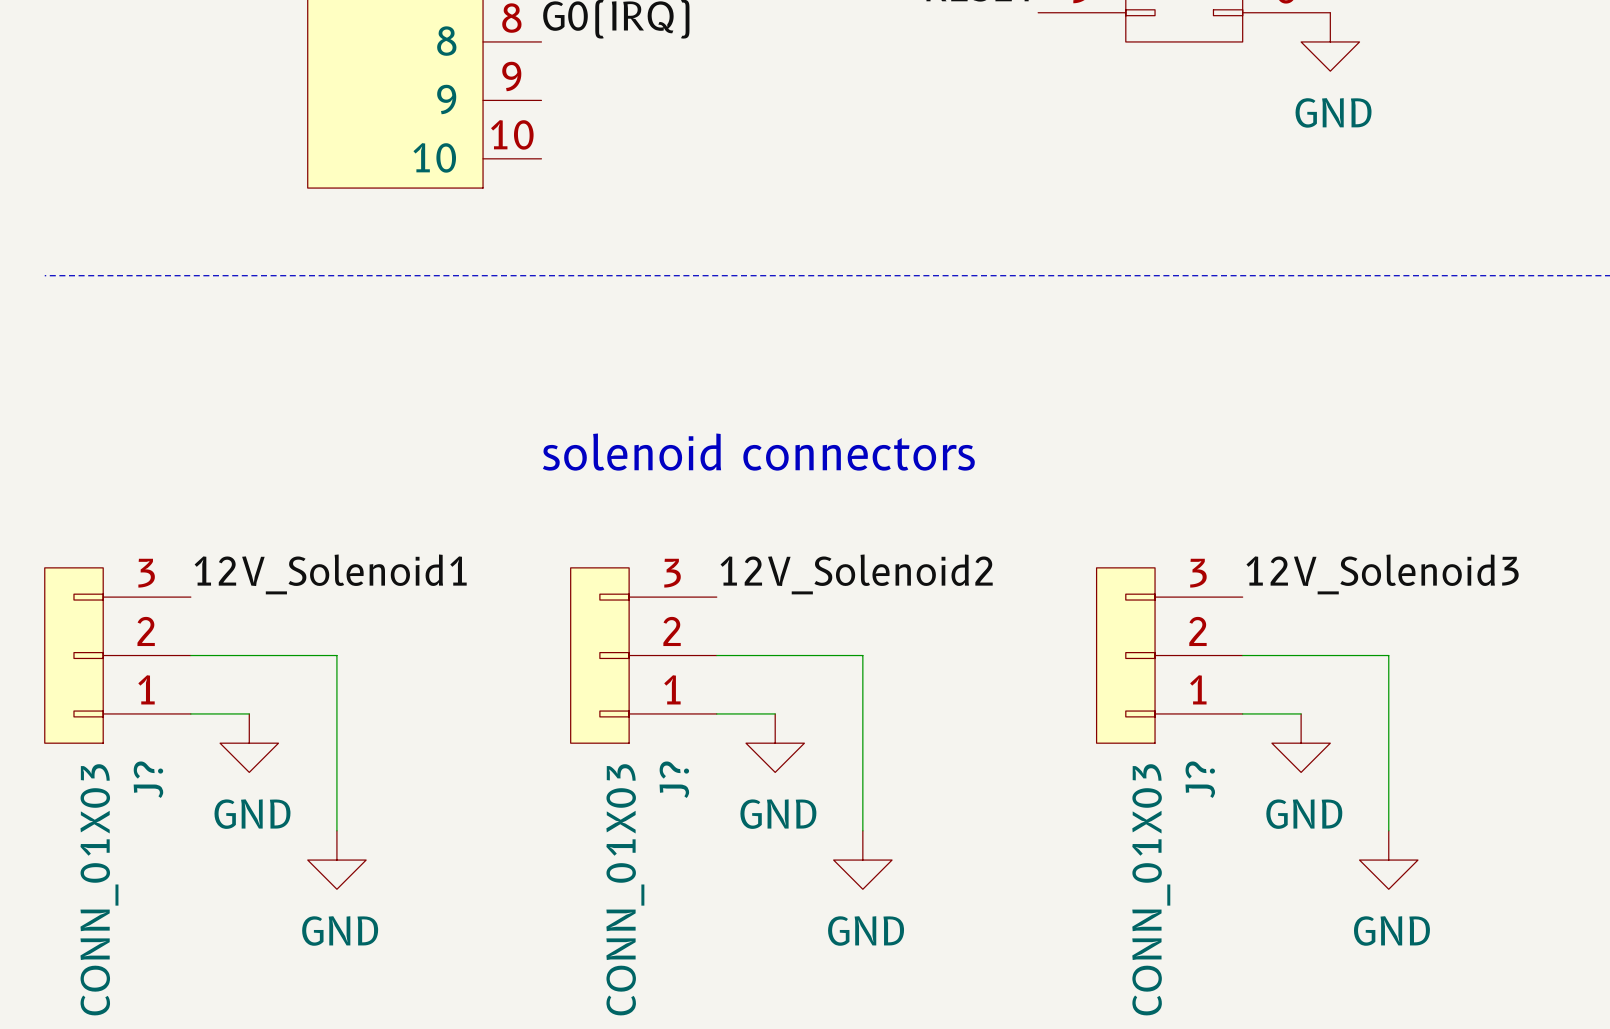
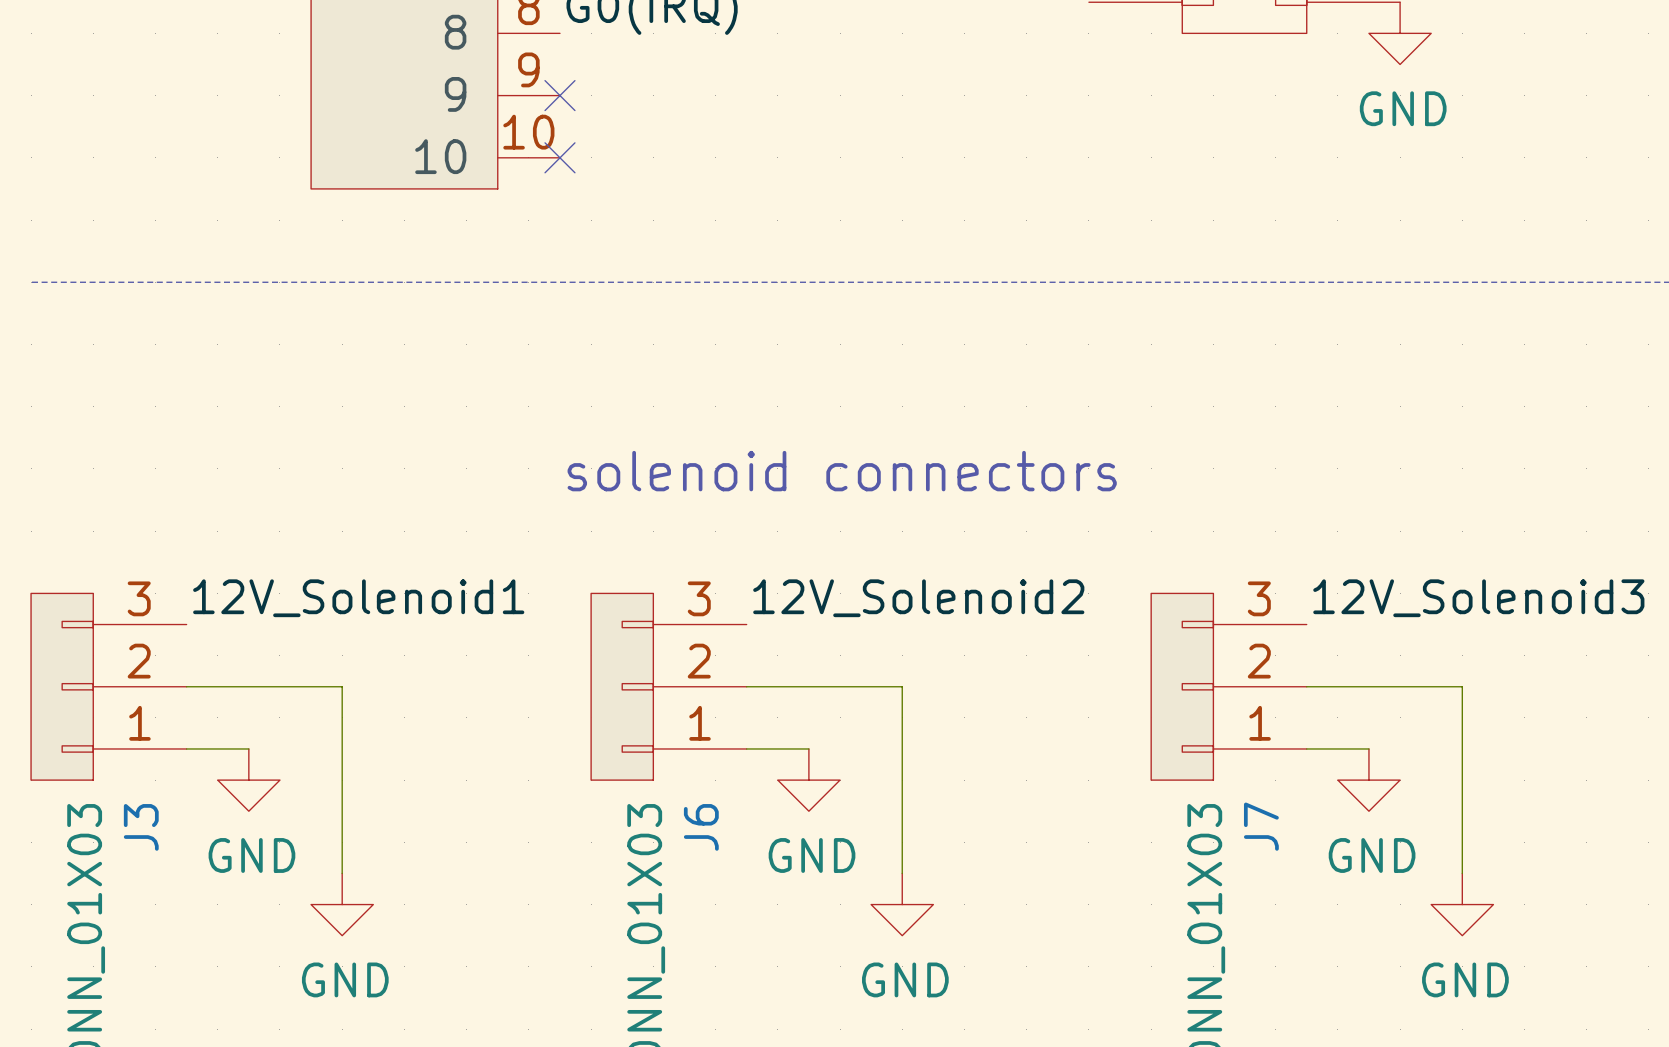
no-connect mark: none -> (559, 95)
no-connect mark: none -> (559, 157)
J? name: J? (148, 779) -> J3 (141, 827)
J? name: J? (674, 779) -> J6 (701, 827)
J? name: J? (1200, 779) -> J7 (1261, 826)

